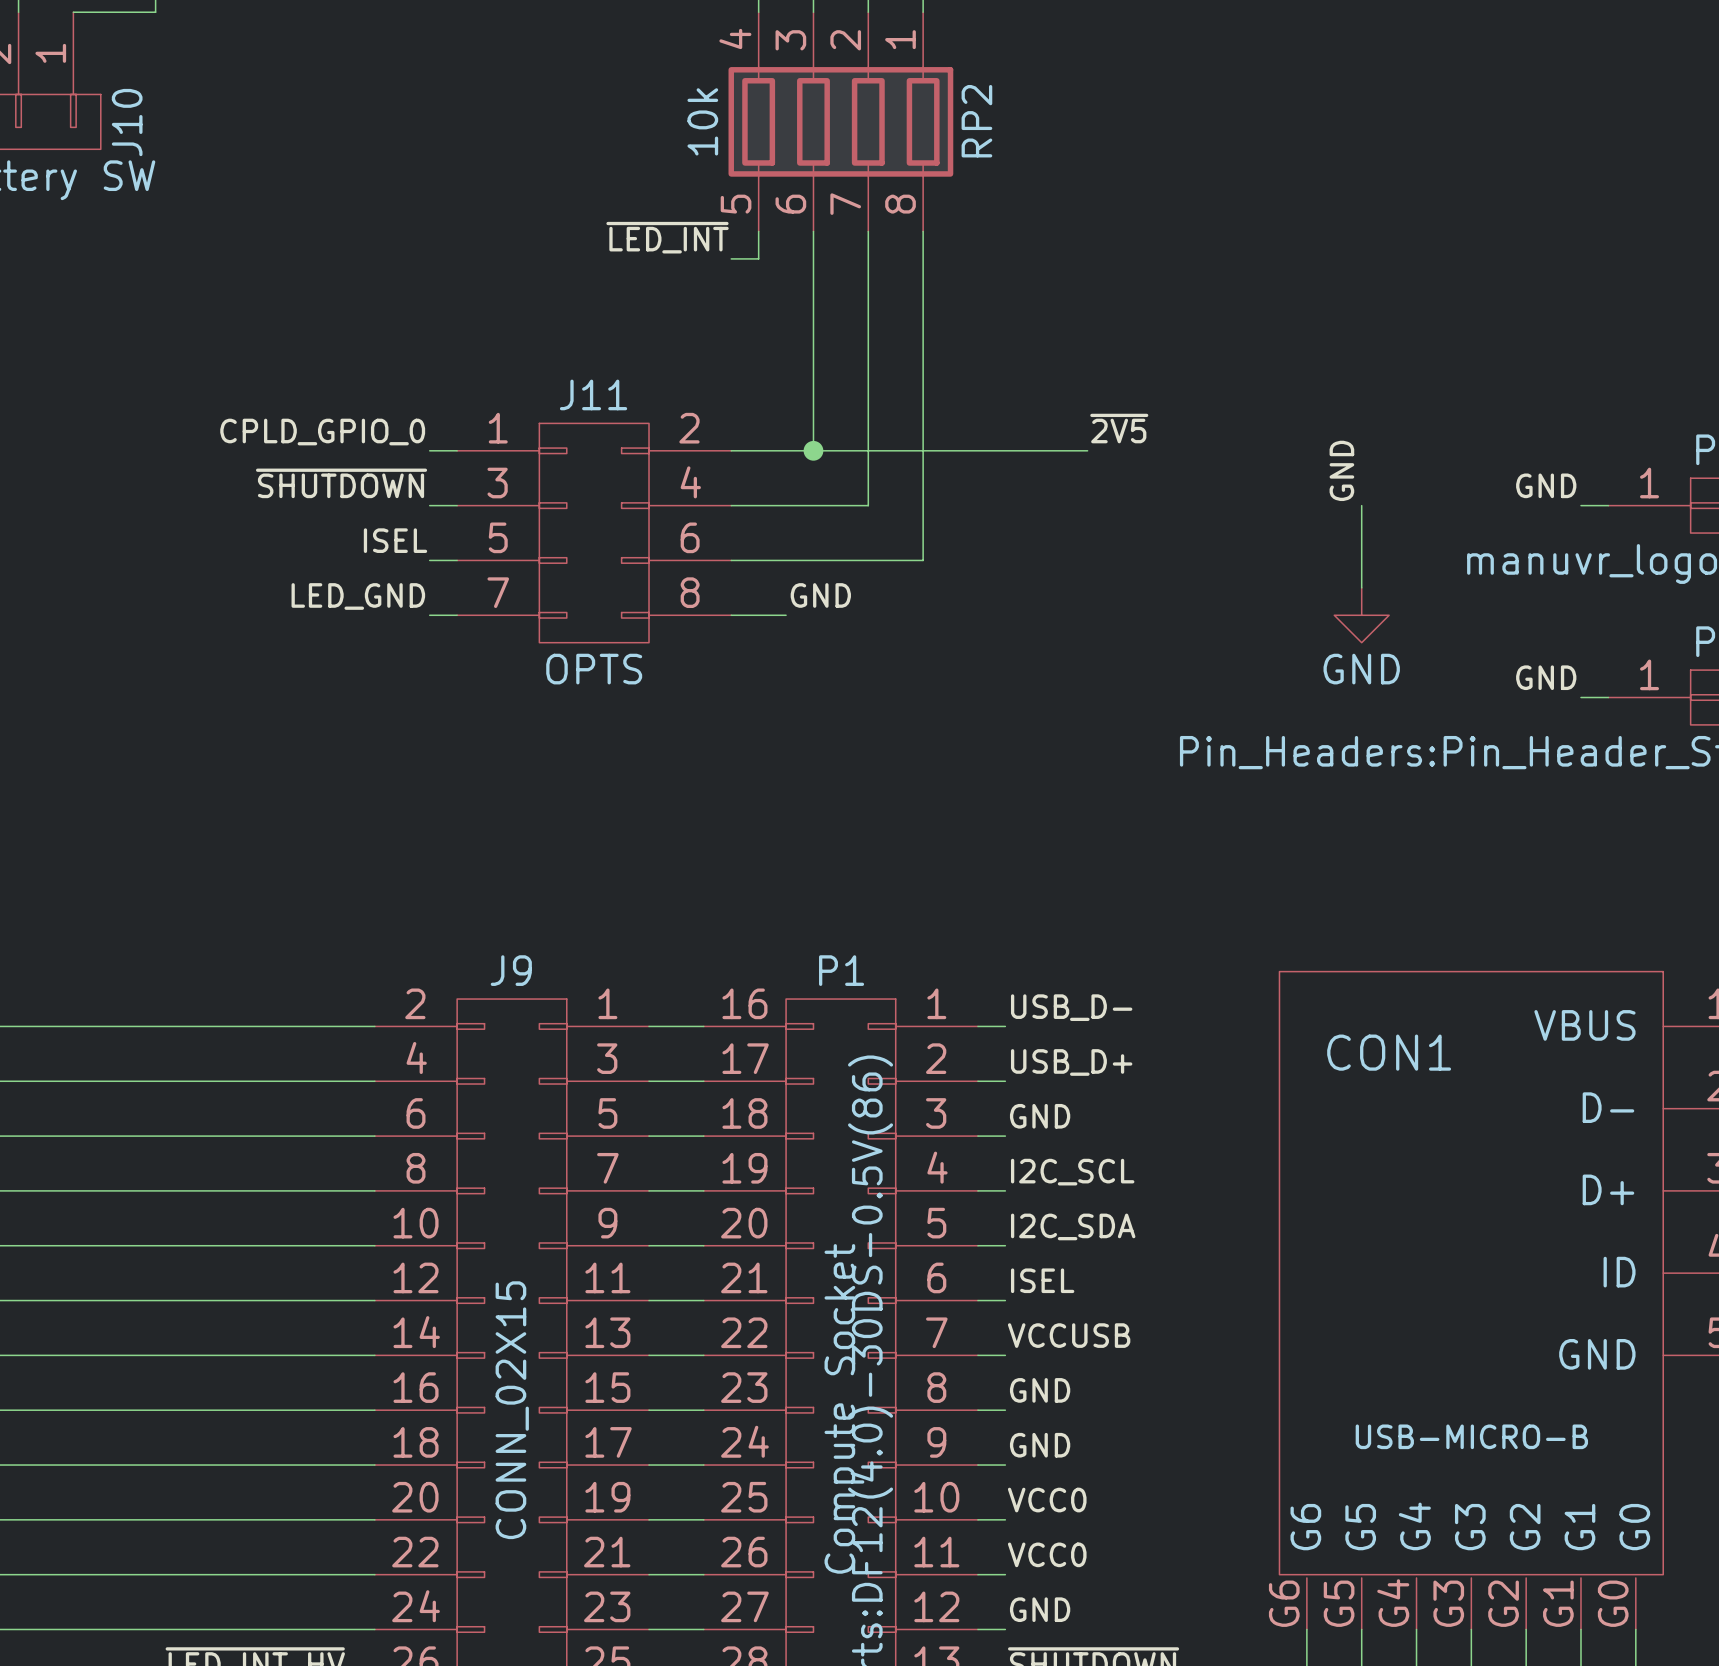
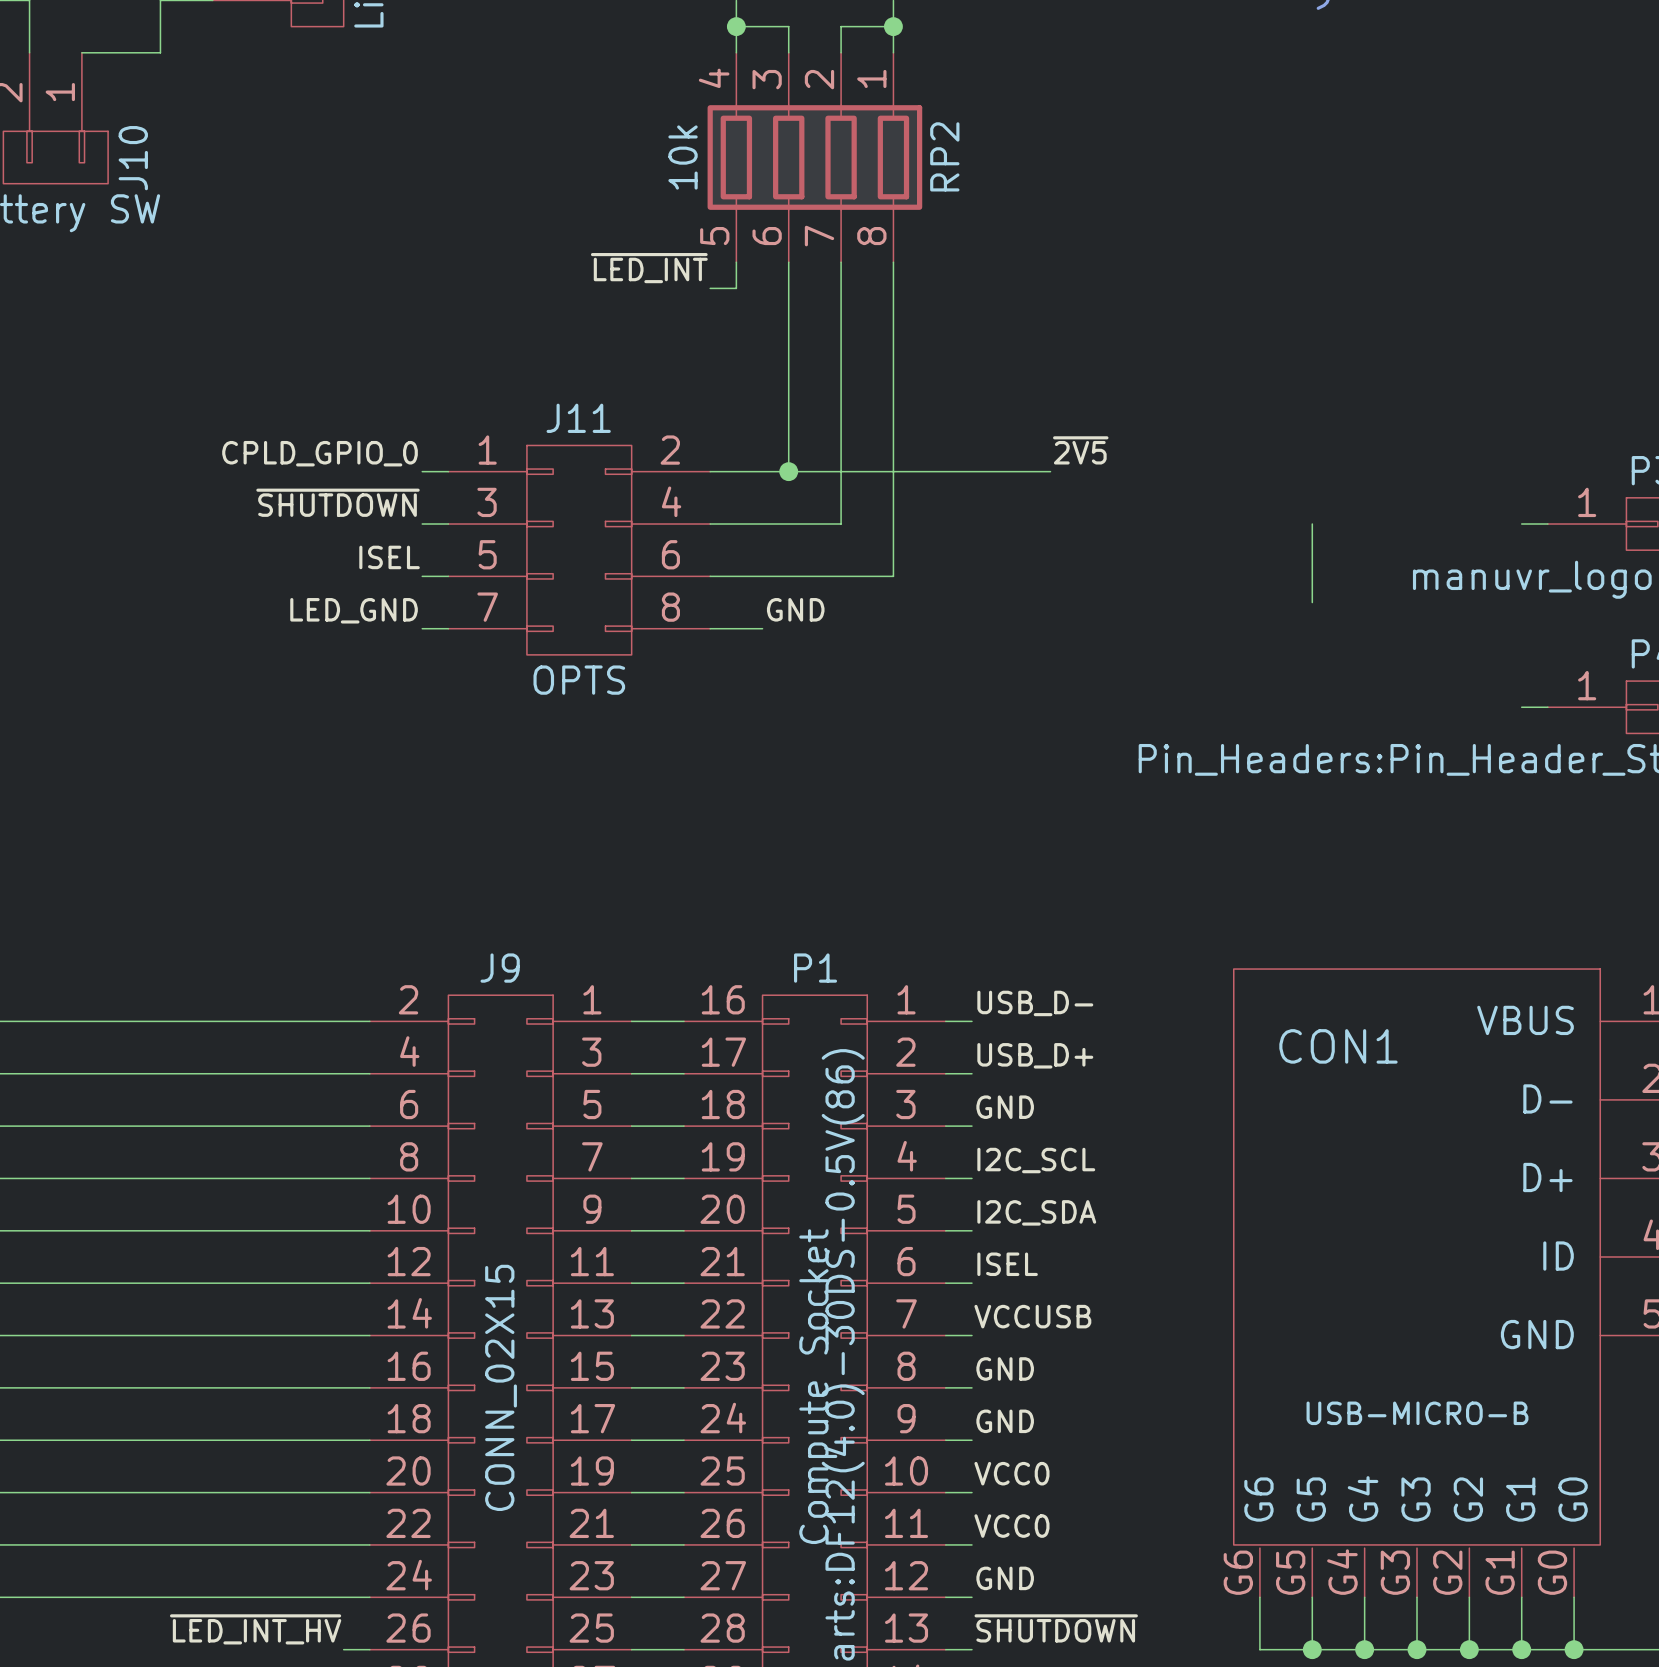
label: GND (1341, 470) -> none
label: GND (1546, 485) -> none
power symbol: GND (1361, 615) -> none
label: GND (1546, 677) -> none

